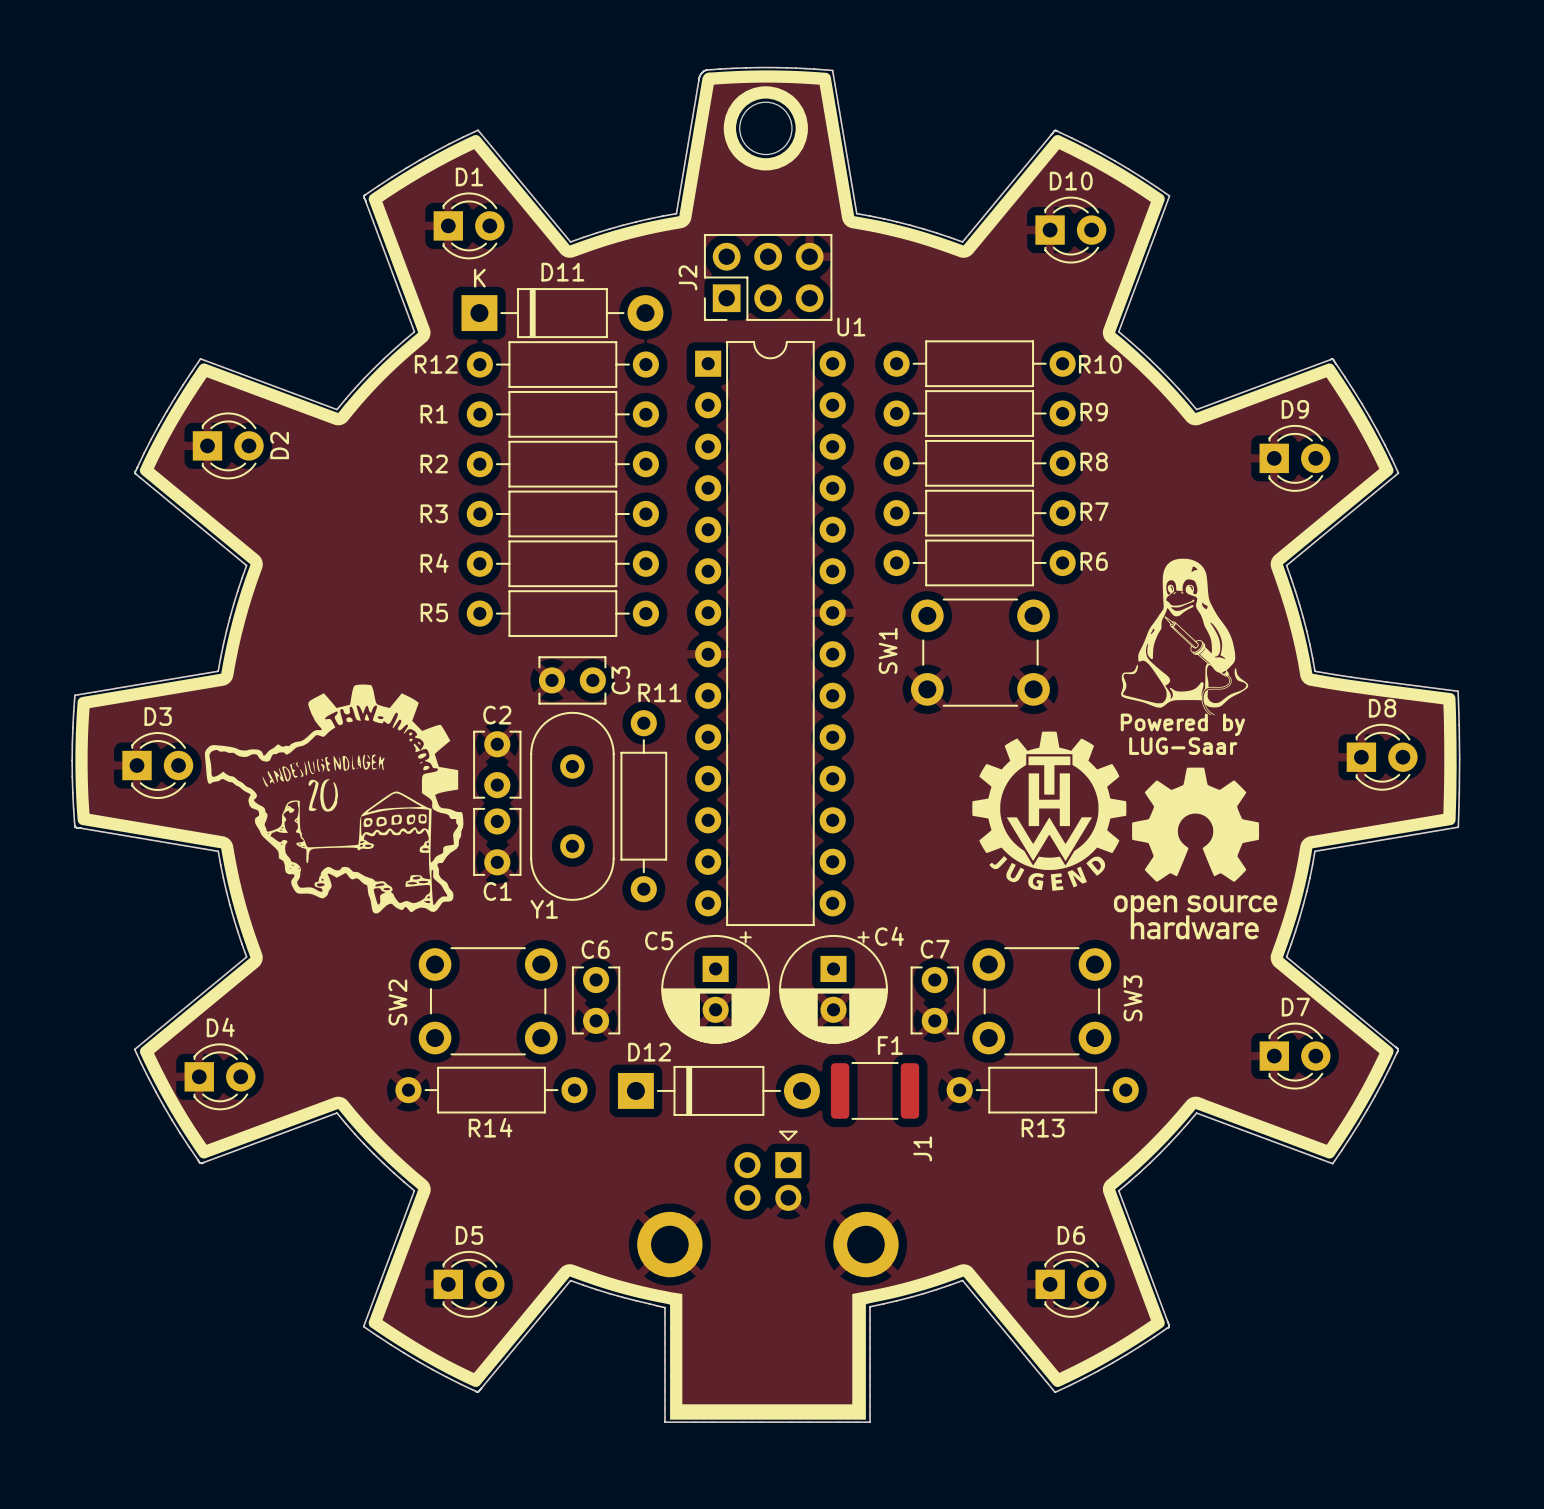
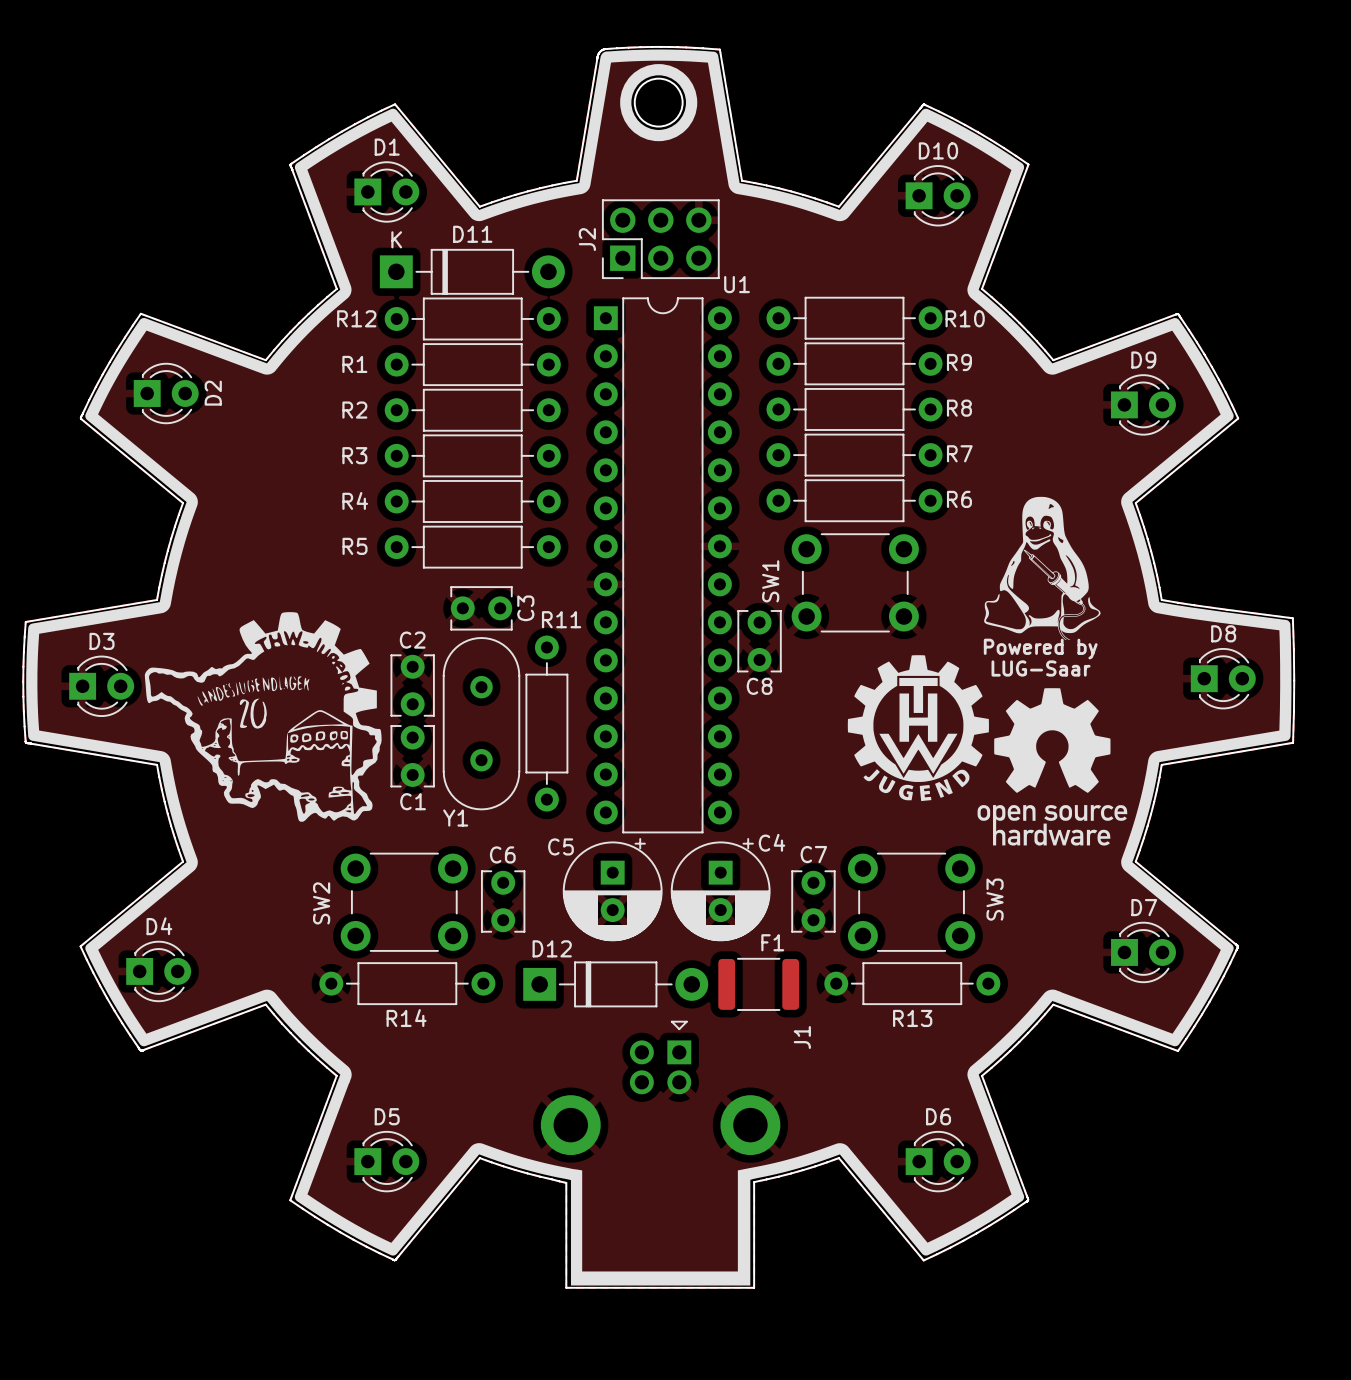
C8: none -> (759, 641)

